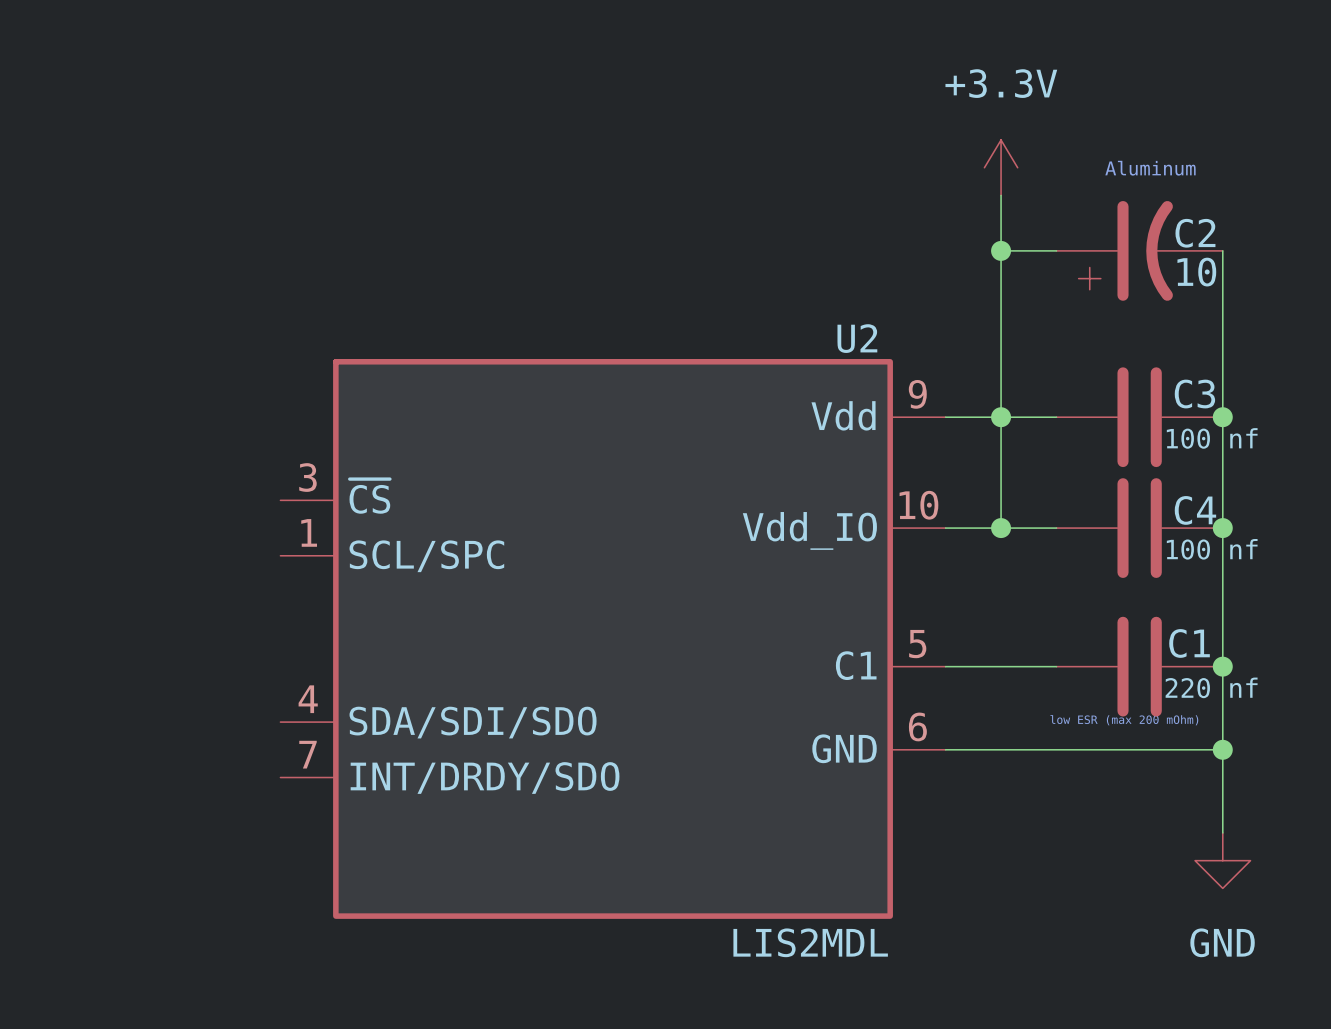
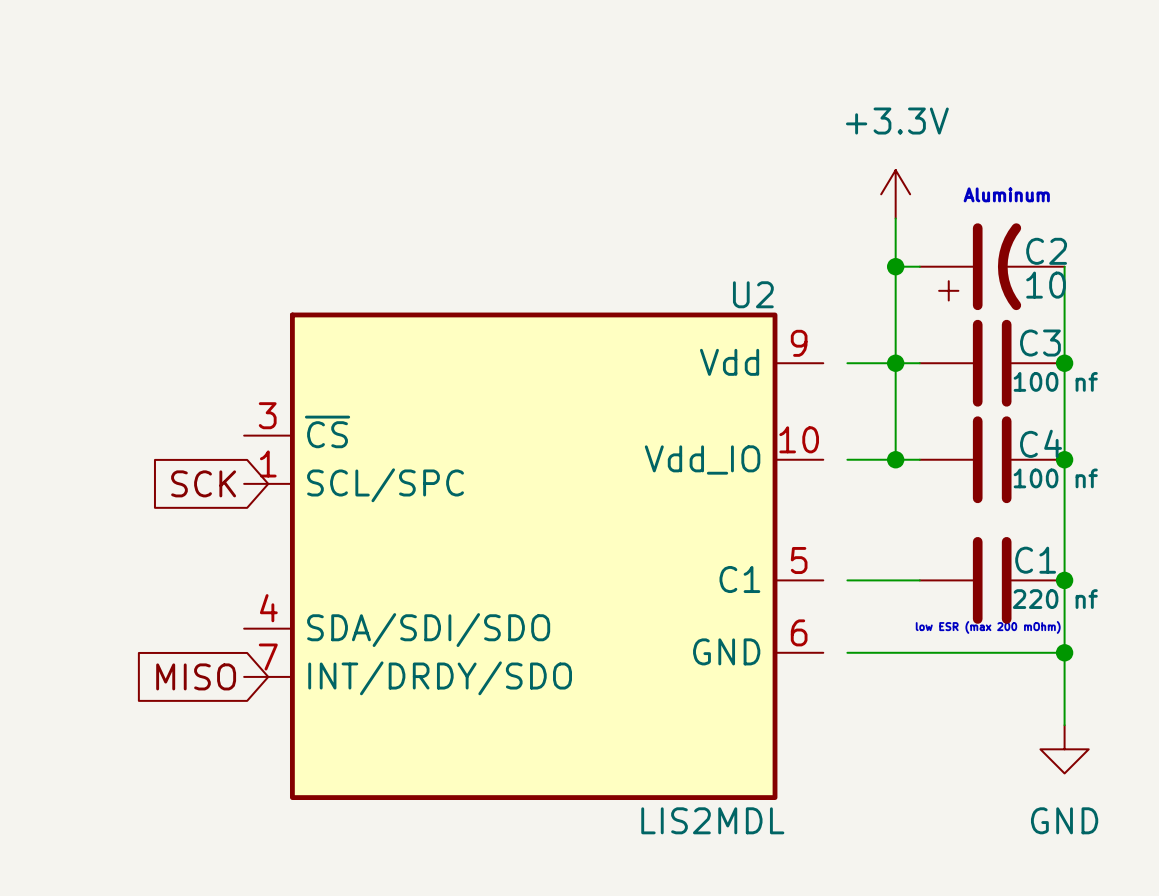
power symbol position: +3.3V (1001, 167) -> +3.3V (895, 194)
text position: Aluminum (1150, 168) -> Aluminum (1006, 194)
wire: (1001, 195) (1001, 528) -> none
wire: (1001, 250) (1056, 250) -> none
junction: (1001, 250) -> none
wire: none -> (895, 218) (895, 459)
C2 position: (1139, 250) -> (992, 266)
wire: (1222, 250) (1222, 306) -> none
junction: none -> (895, 266)
wire: (945, 417) (973, 417) -> (895, 266) (919, 266)
junction position: (1001, 417) -> (895, 363)
wire: (945, 528) (973, 528) -> none
junction position: (1001, 528) -> (895, 459)
global label: none -> SCK (203, 483)
wire: (945, 666) (973, 666) -> none
wire: (945, 749) (973, 749) -> none
global label: none -> MISO (196, 676)

